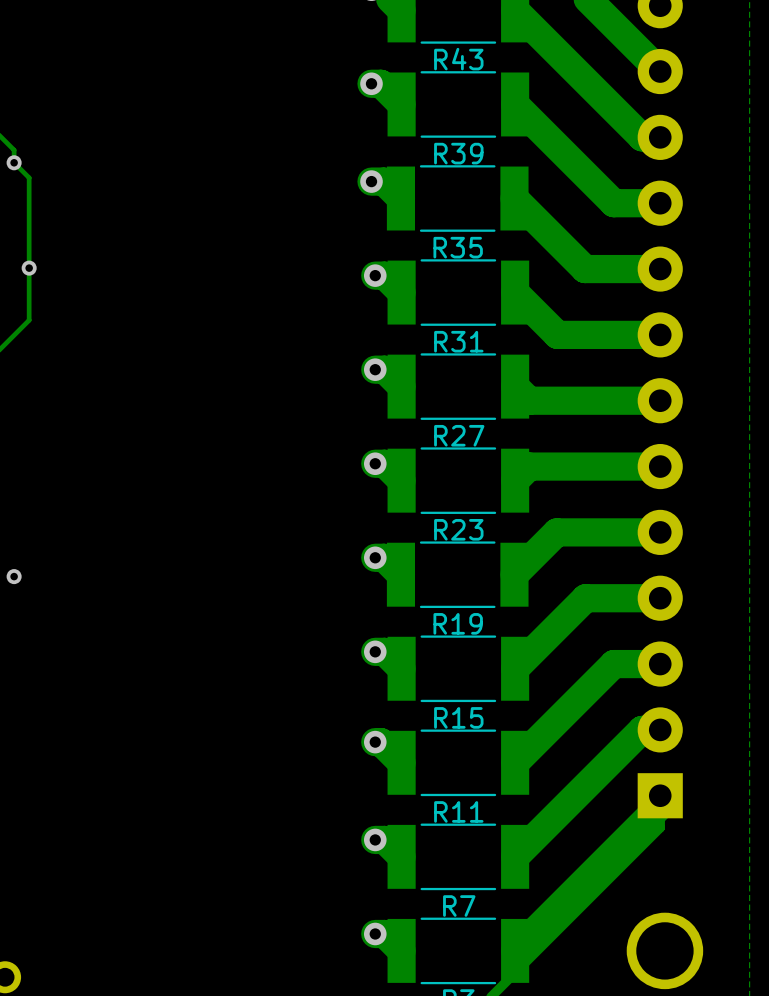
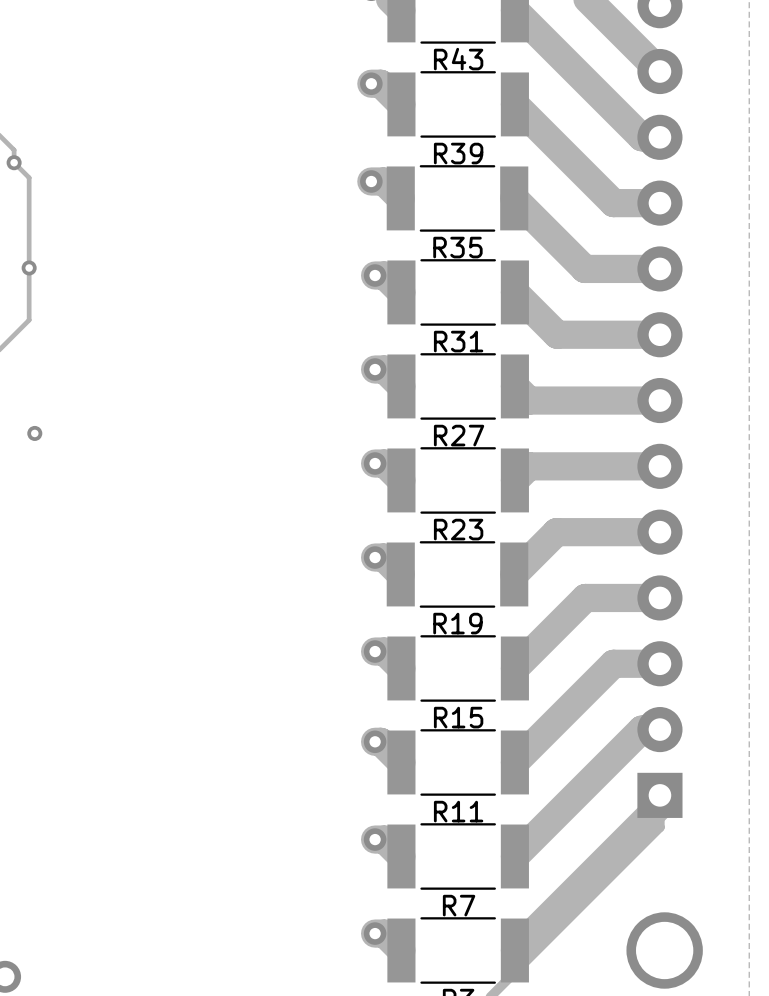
via: none -> (34, 433)
via: (14, 576) -> none

